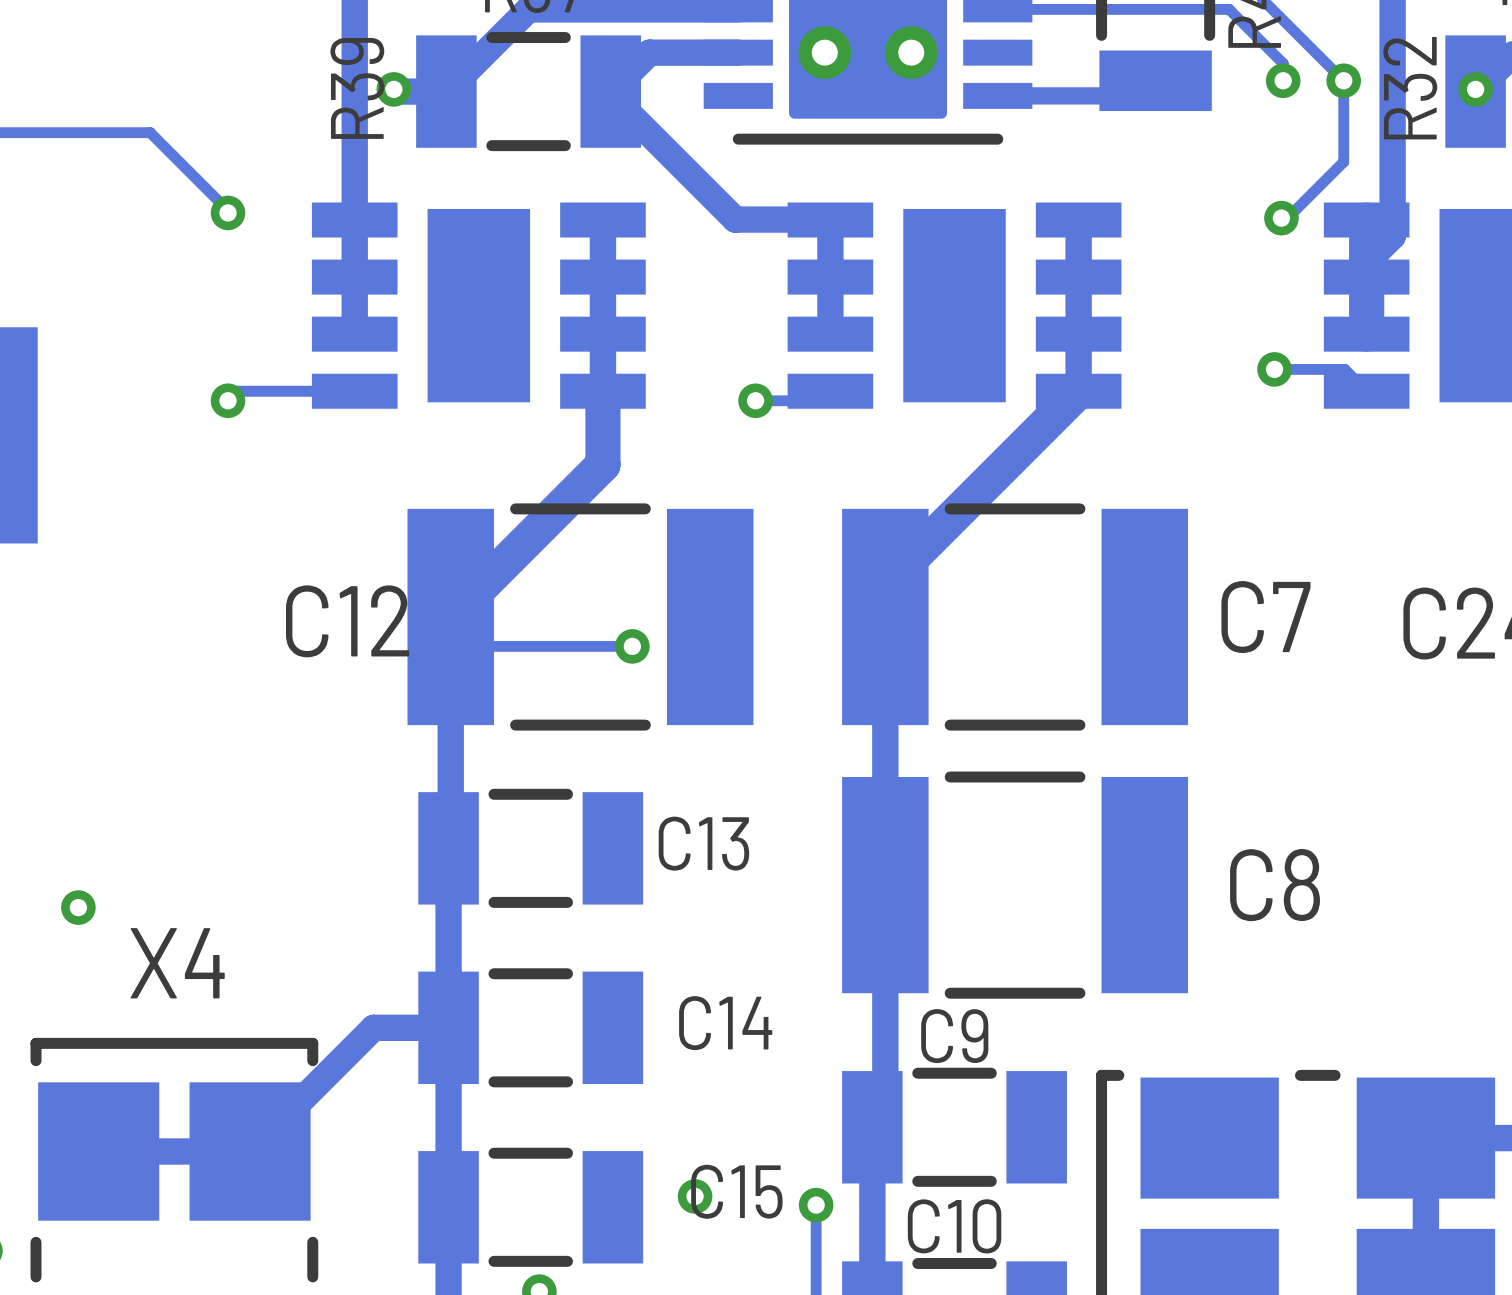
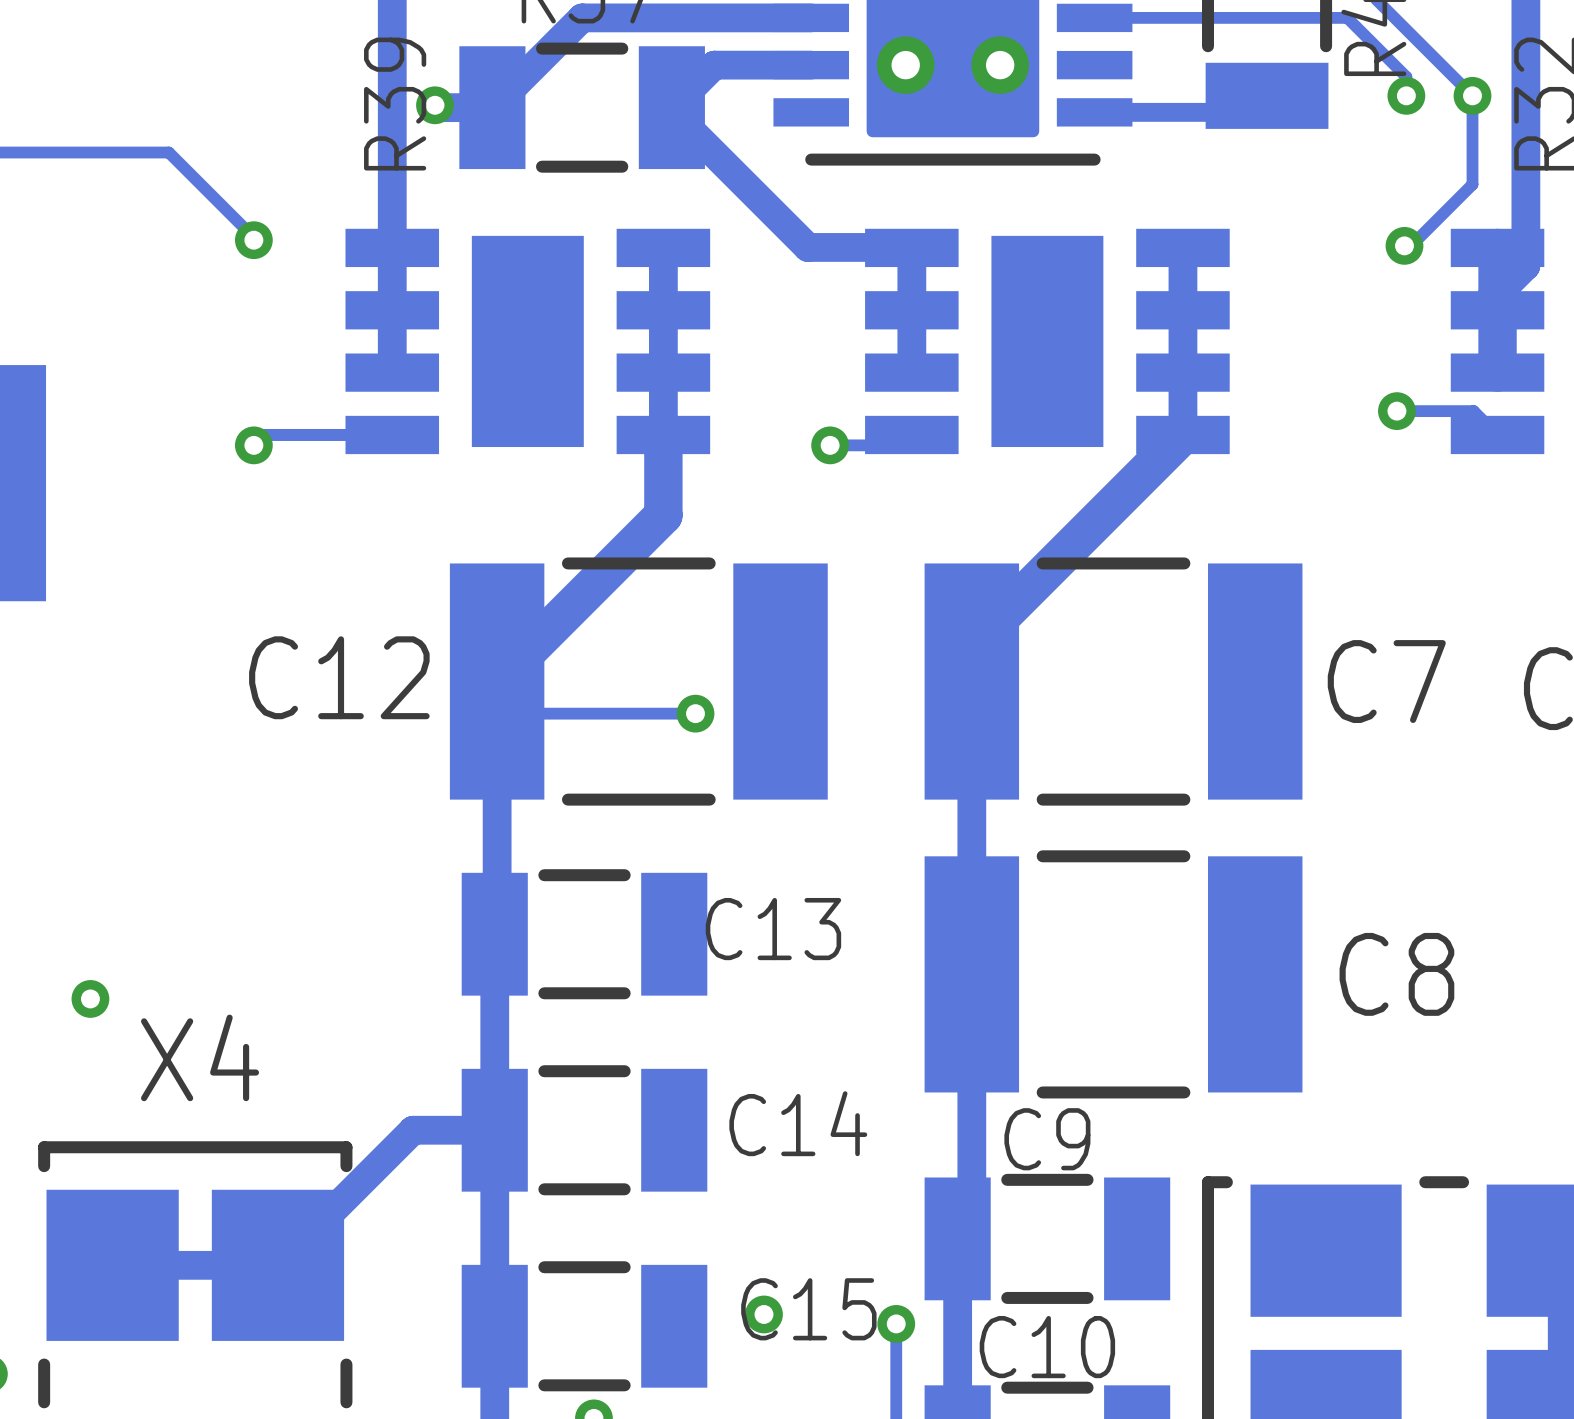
C12 name position: C12 (347, 621) -> C12 (339, 677)

